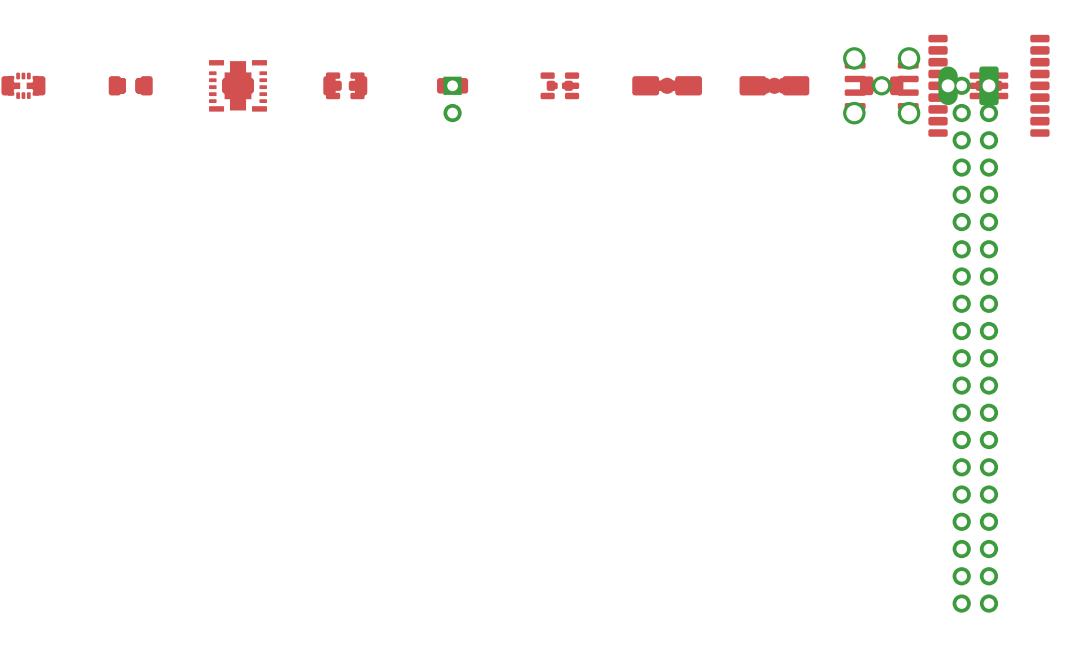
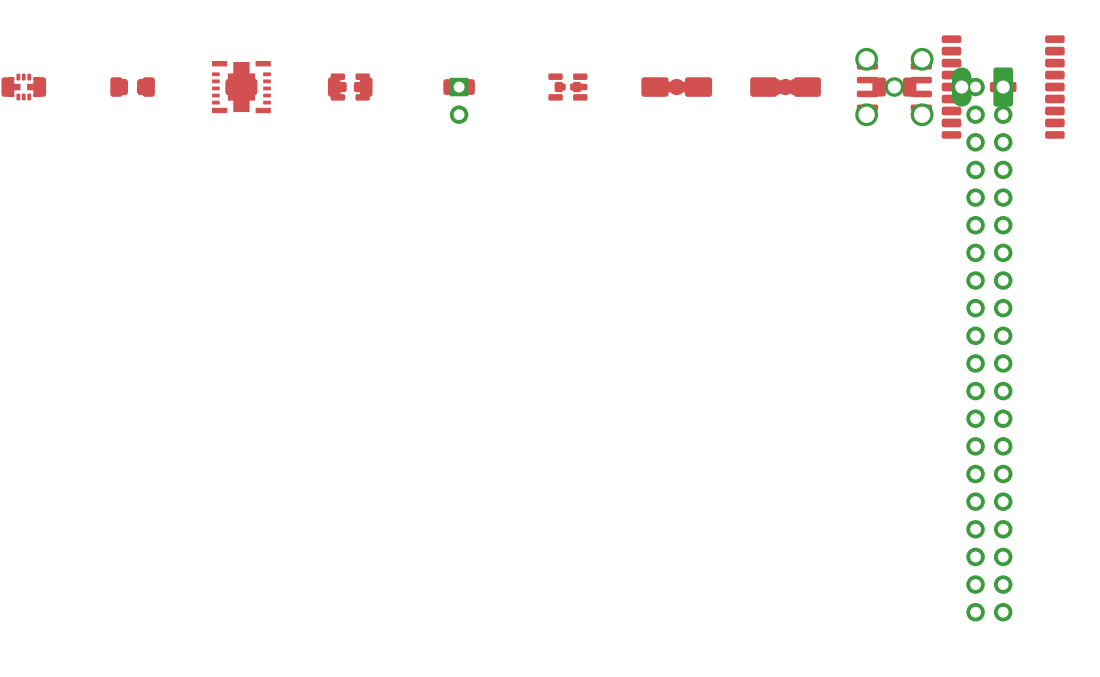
part: (988, 85) -> none

